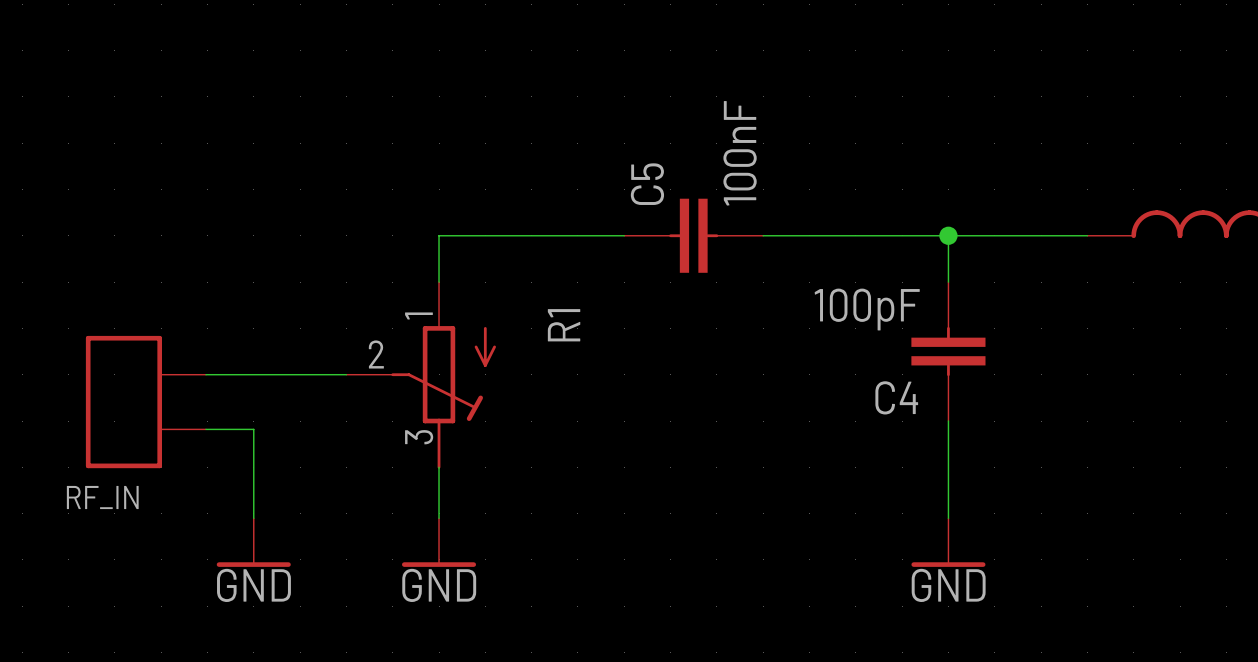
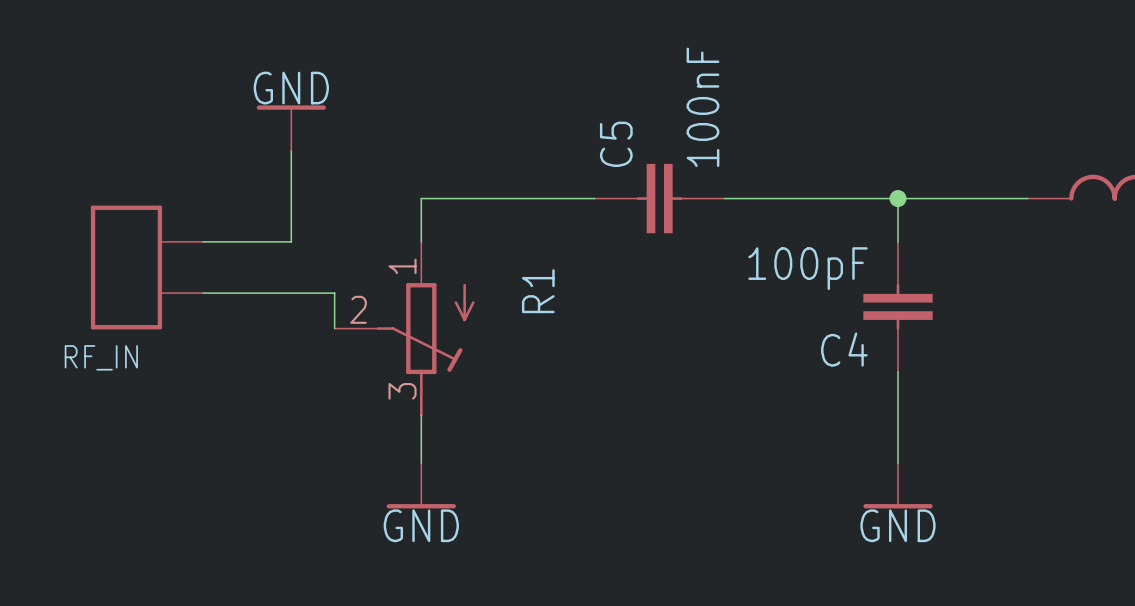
wire: none -> (291, 150) (291, 241) (203, 241)
wire: (205, 374) (346, 374) -> (203, 293) (334, 293) (334, 328)
RF_IN position: (145, 402) -> (147, 267)
wire: (205, 429) (253, 429) (253, 518) -> none
power symbol position: GND (253, 542) -> GND (291, 128)
power symbol rotation: 0° (253, 564) -> 180° (291, 107)

